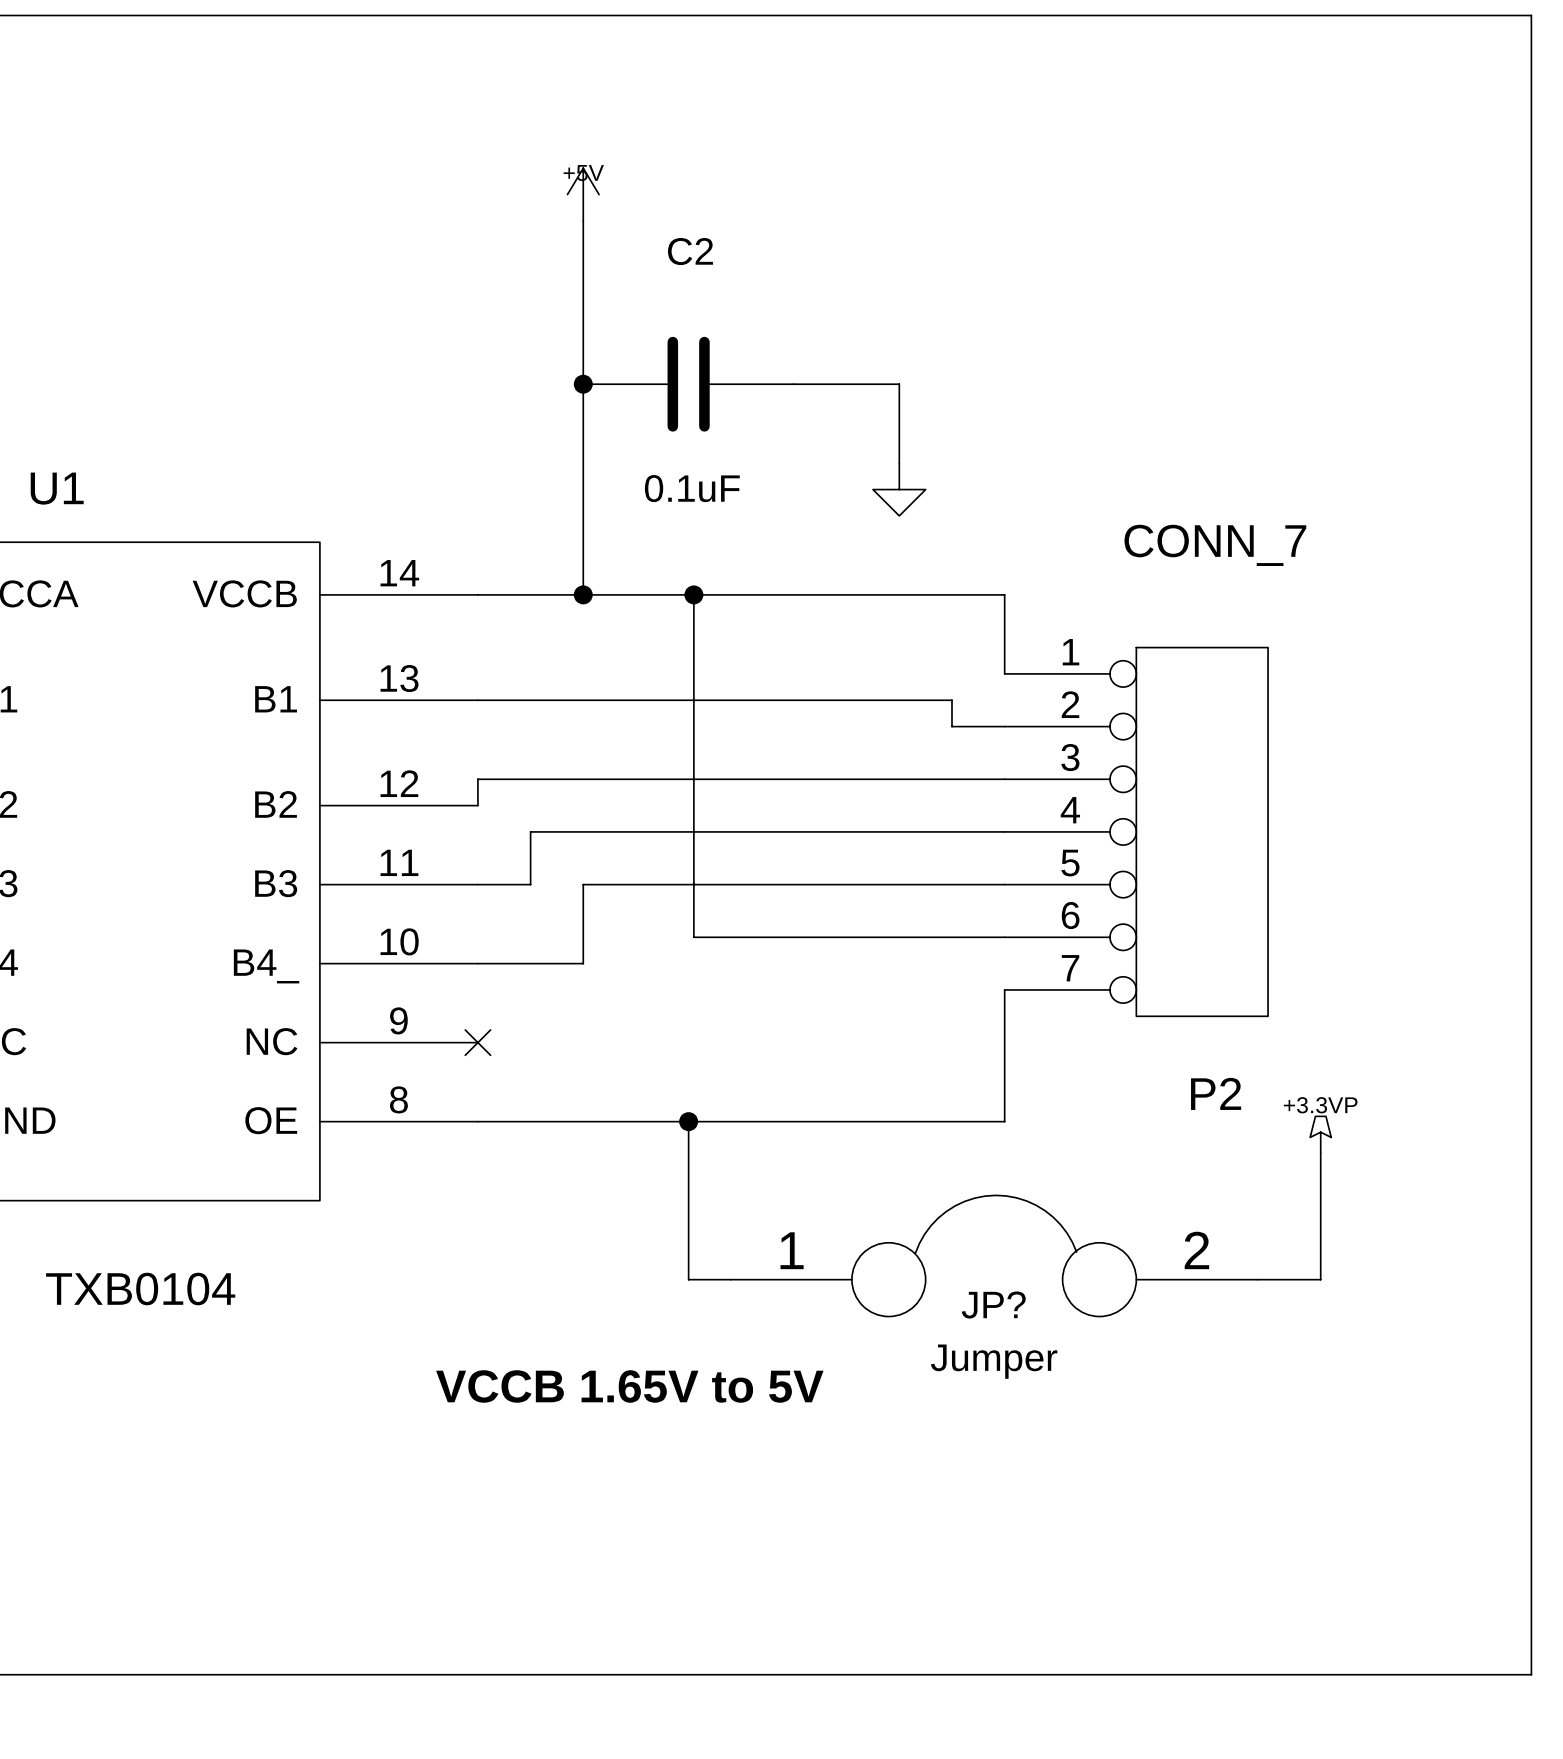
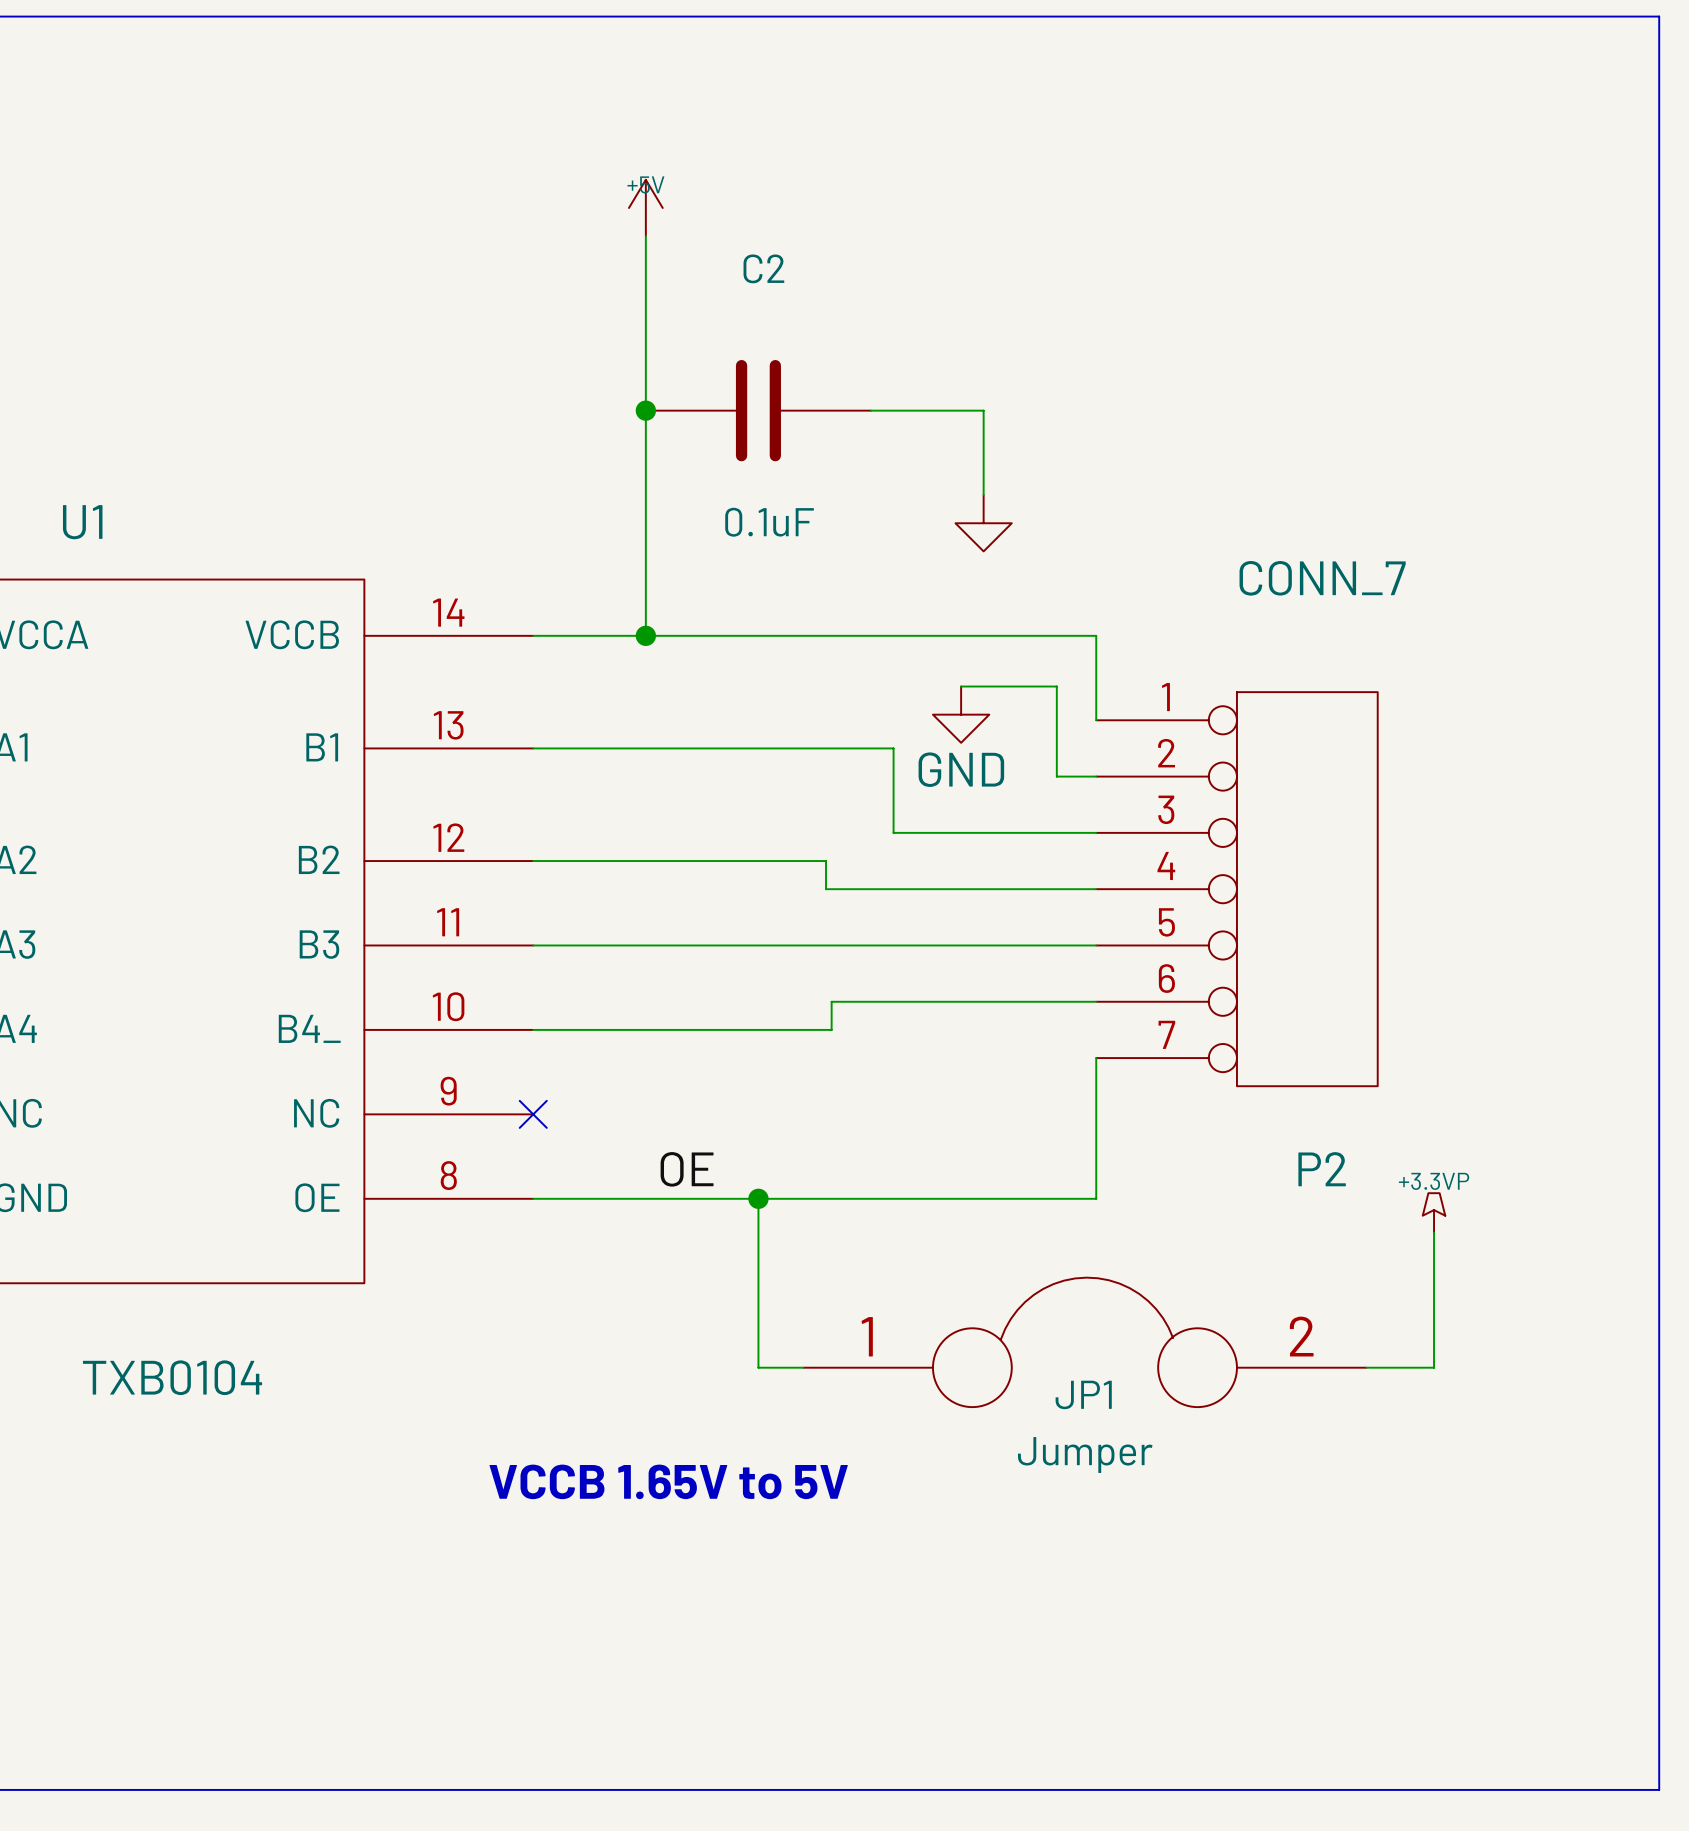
wire: (693, 594) (693, 937) (757, 937) -> (645, 1029) (831, 1029) (831, 1001)
junction: (693, 594) -> none
power symbol: none -> GND (961, 714)
wire: (815, 700) (951, 700) (951, 726) (967, 726) -> (961, 686) (1056, 686) (1056, 776)
wire: none -> (893, 748) (893, 832)
wire: (815, 779) (477, 779) (477, 805) -> (826, 889) (826, 861) (533, 861)
wire: (751, 831) (530, 831) (530, 884) -> none
wire: (583, 884) (583, 963) -> (645, 945) (589, 945)
label: none -> OE (687, 1169)
JP? name: JP? (993, 1305) -> JP1 (1083, 1394)

